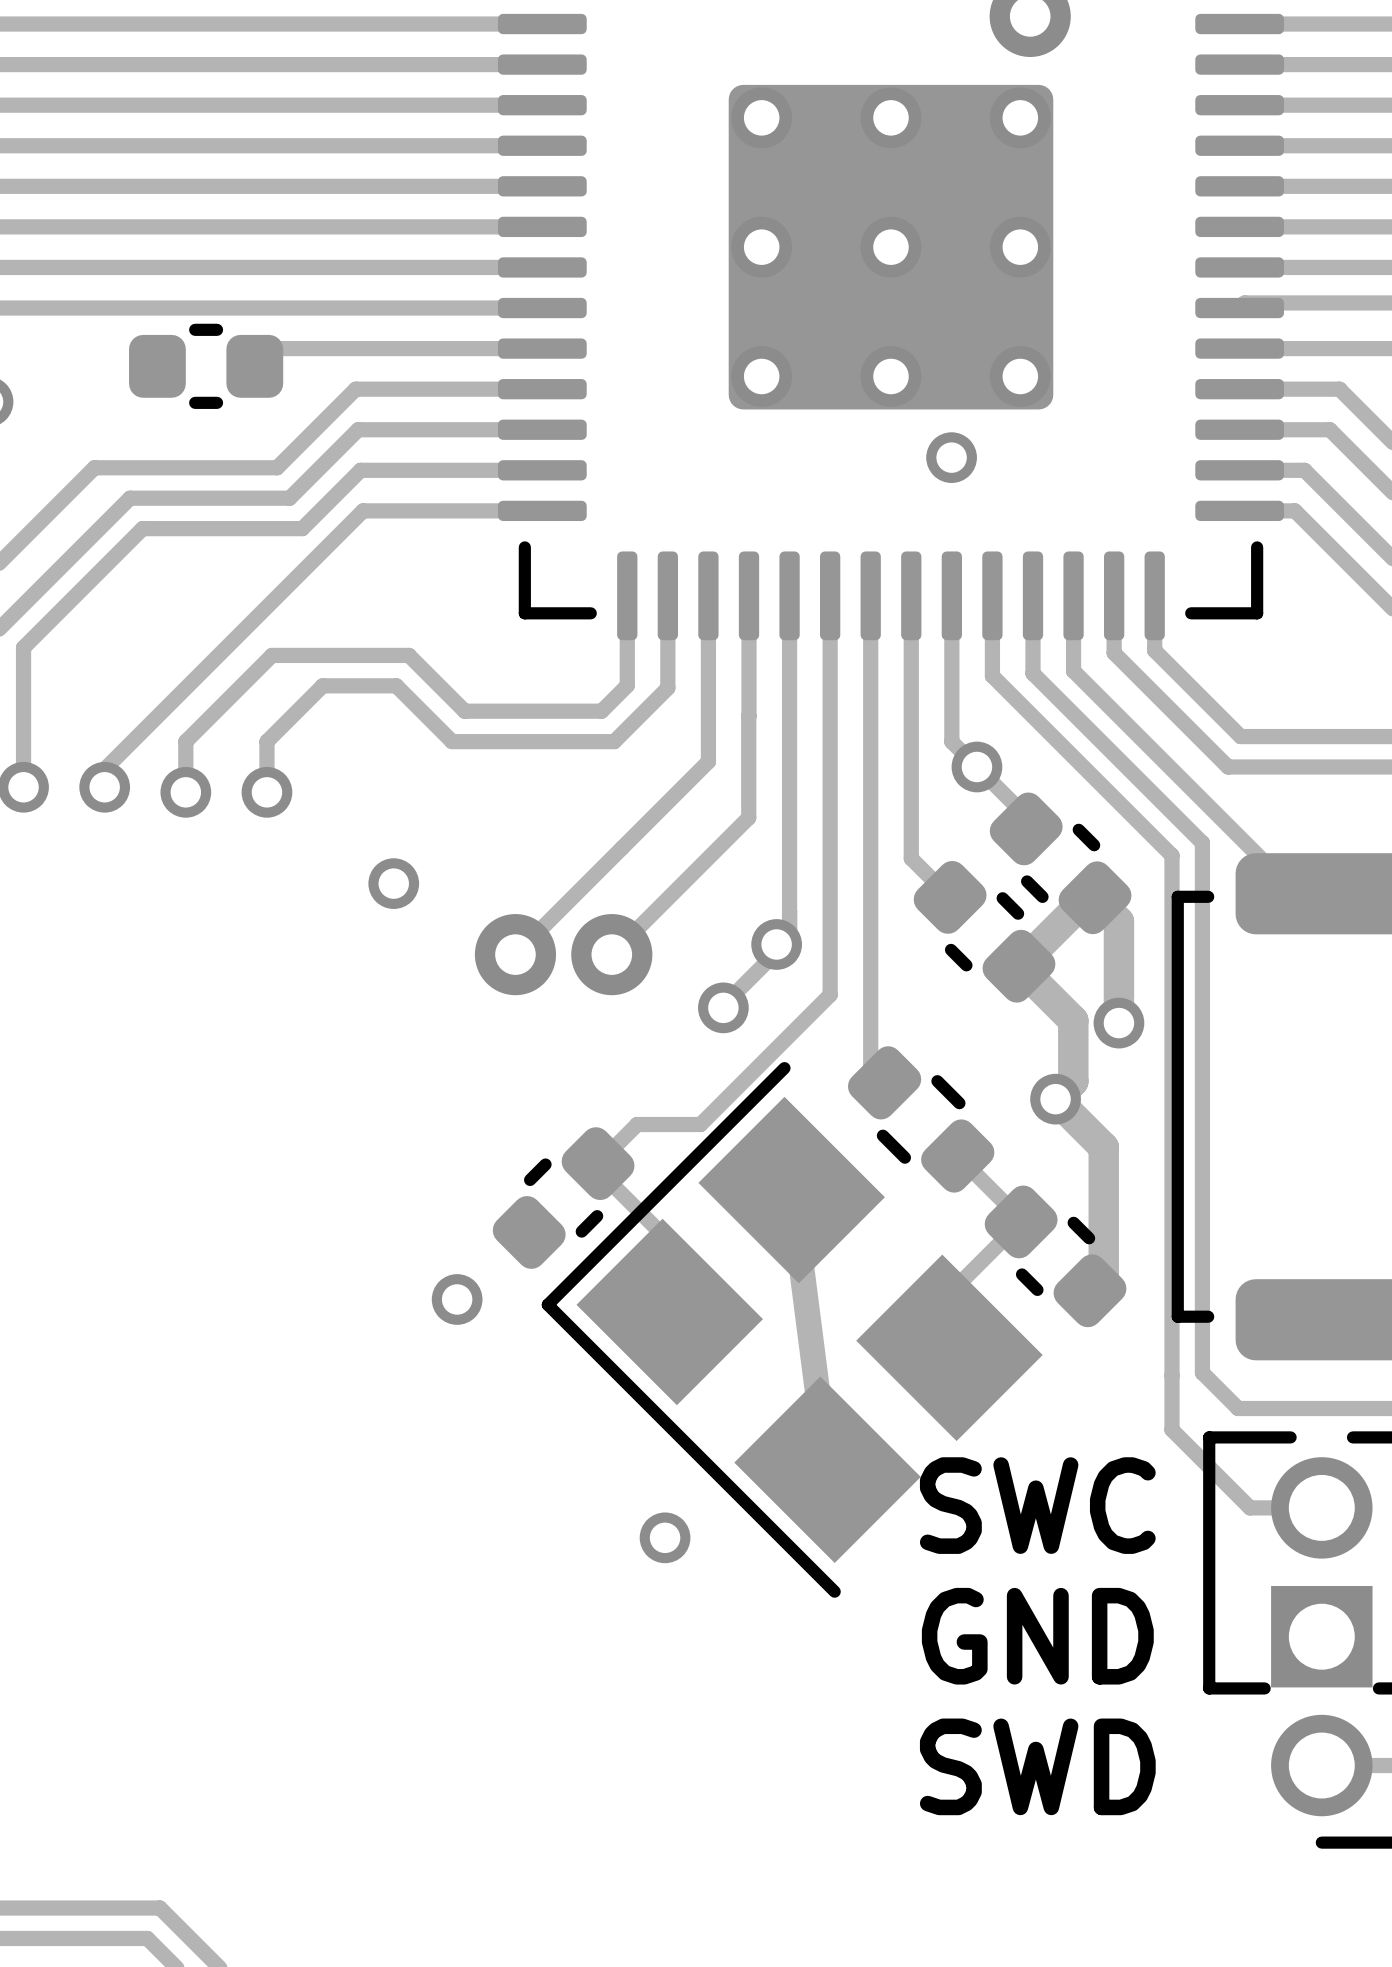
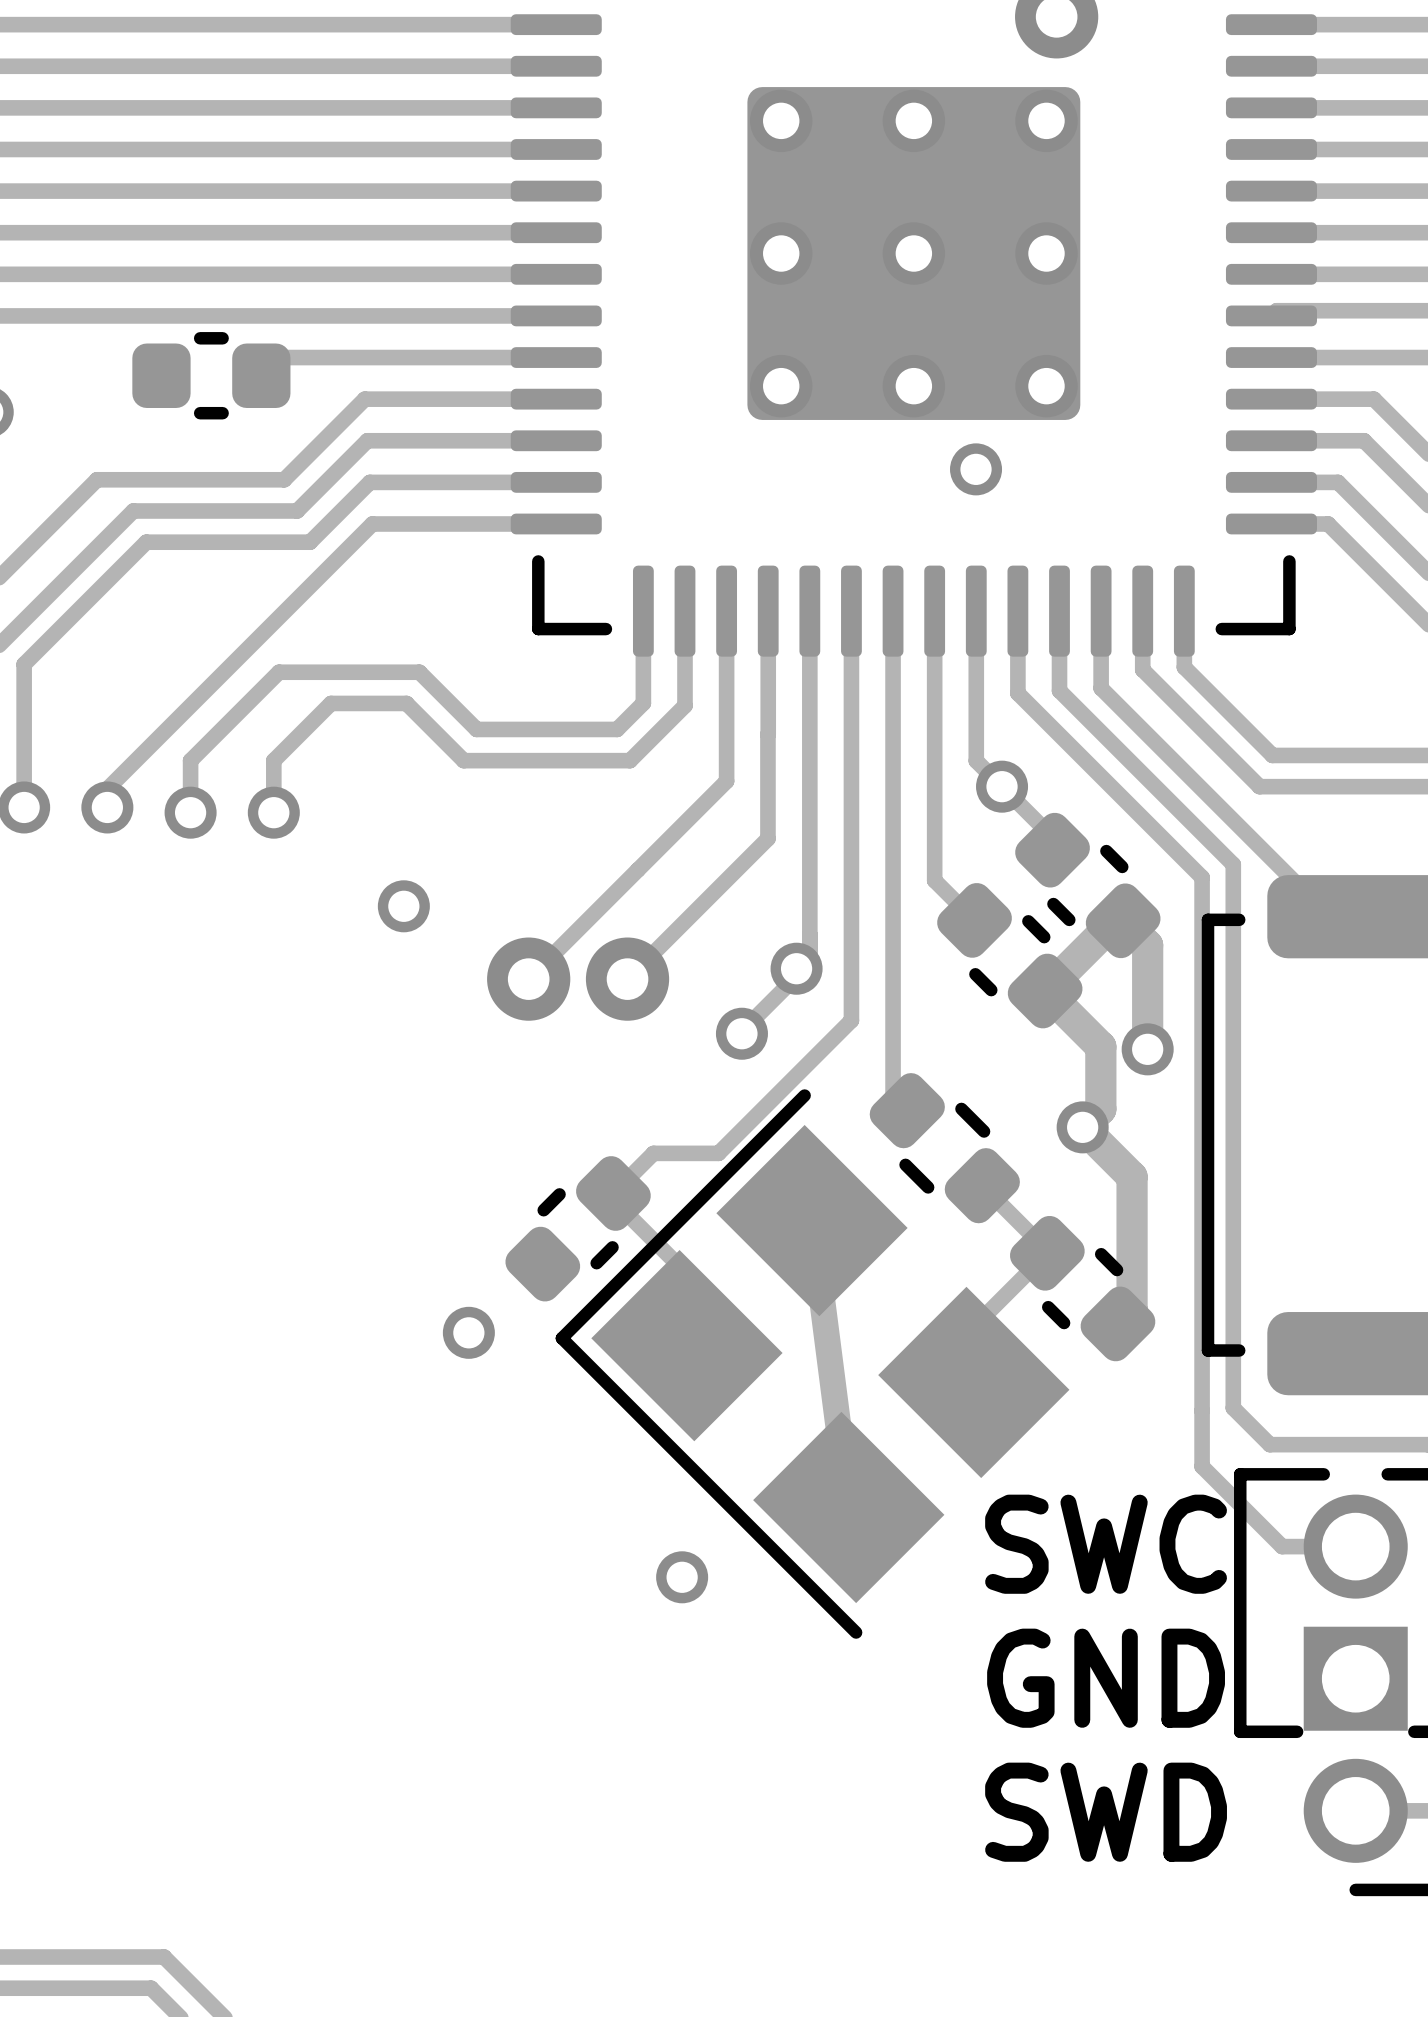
text position: SWC (1037, 1505) -> SWC (1106, 1544)
text position: GND (1037, 1636) -> GND (1106, 1678)
text position: SWD (1037, 1766) -> SWD (1106, 1812)

